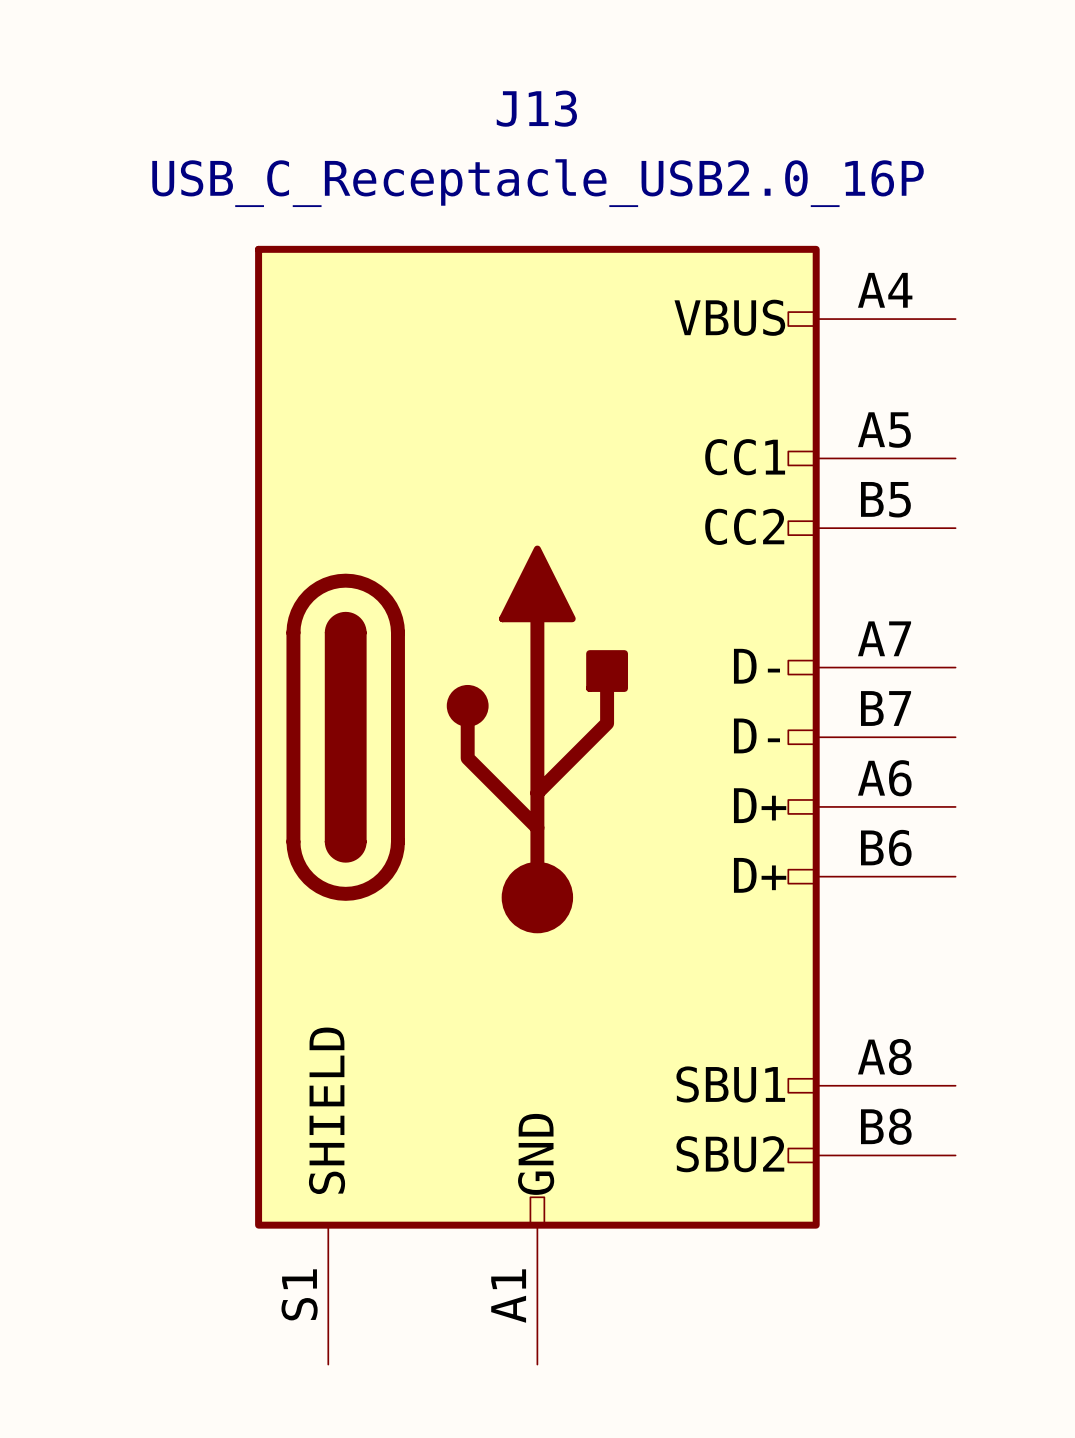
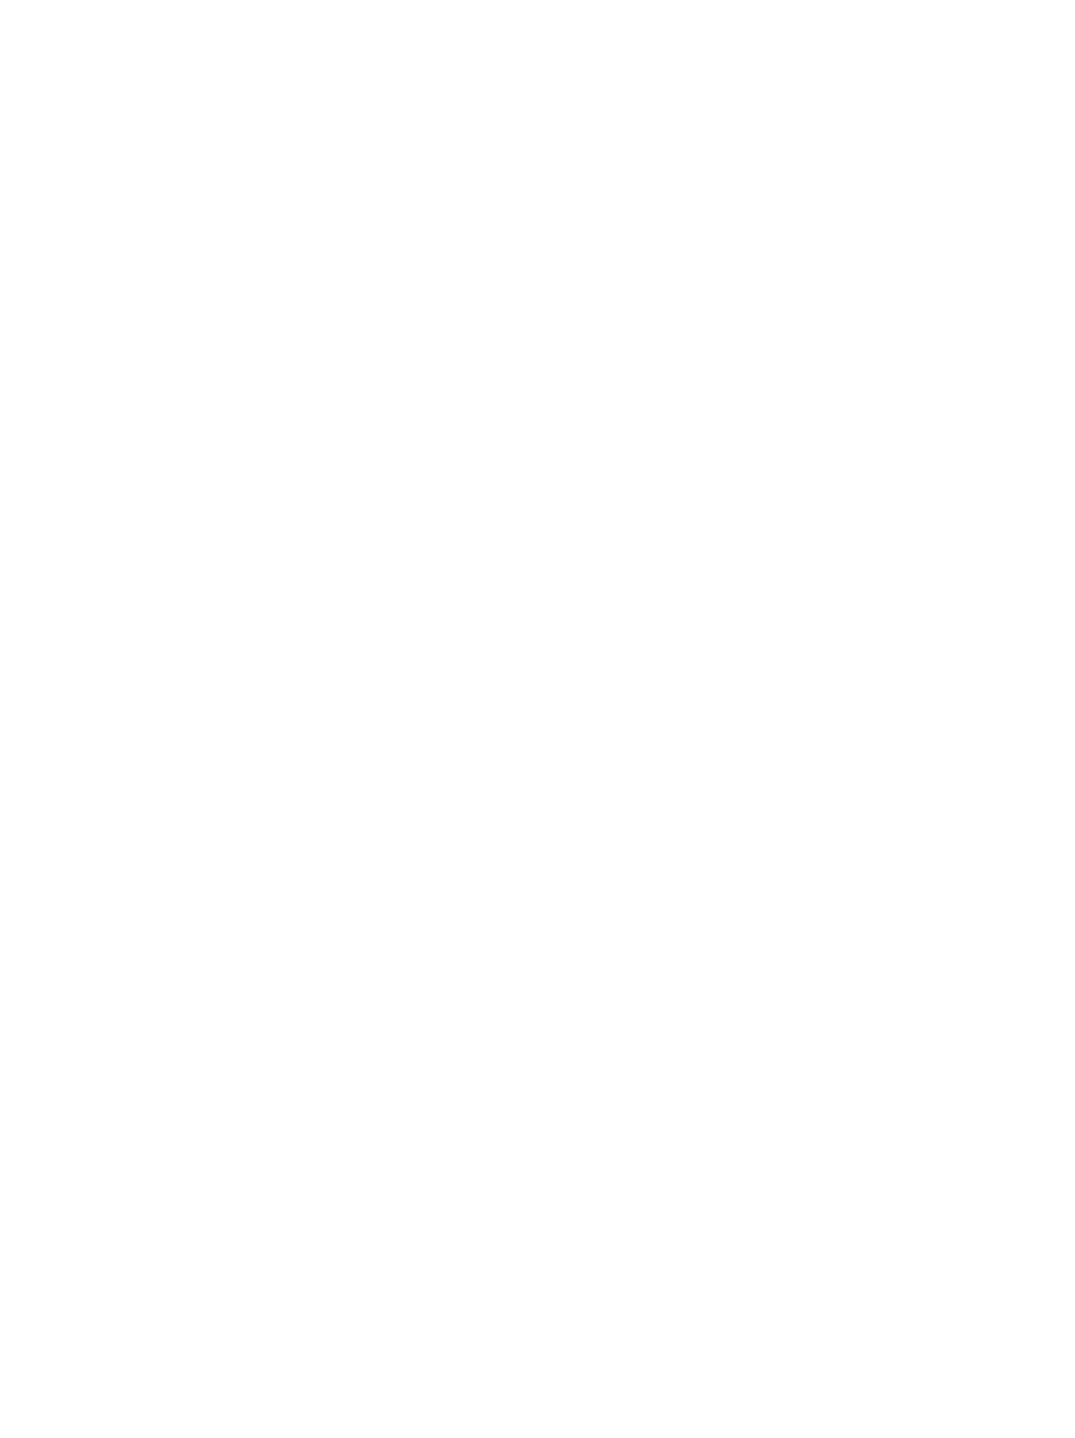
J13: USB_C_Receptacle_USB2.0_16P (605, 805) -> none

